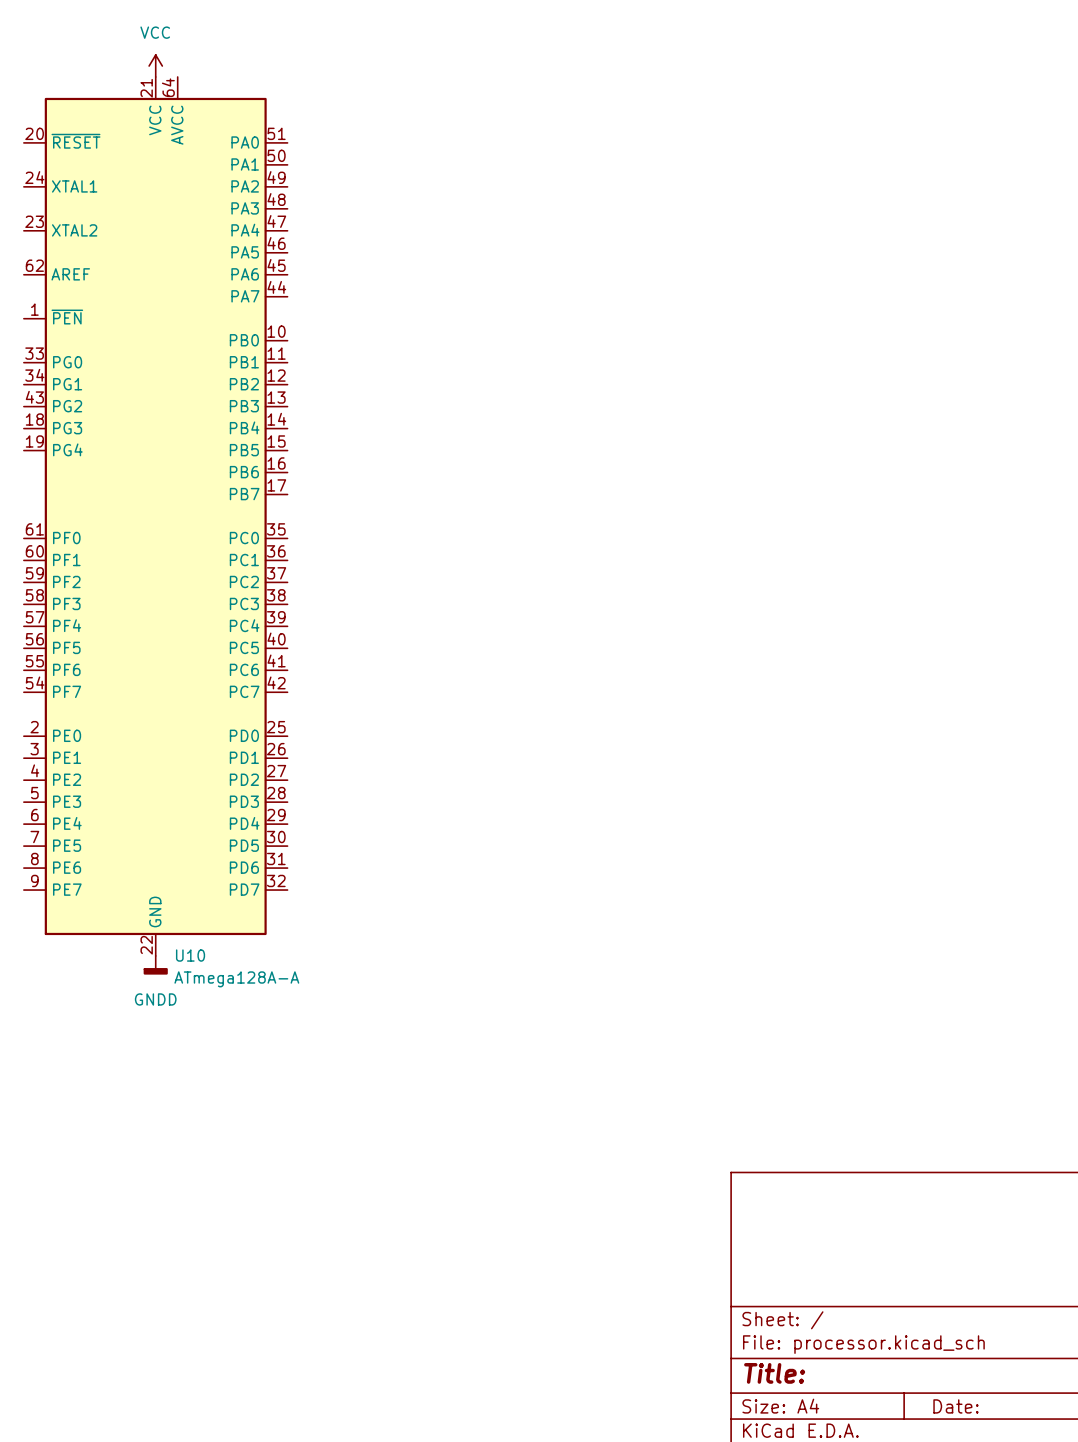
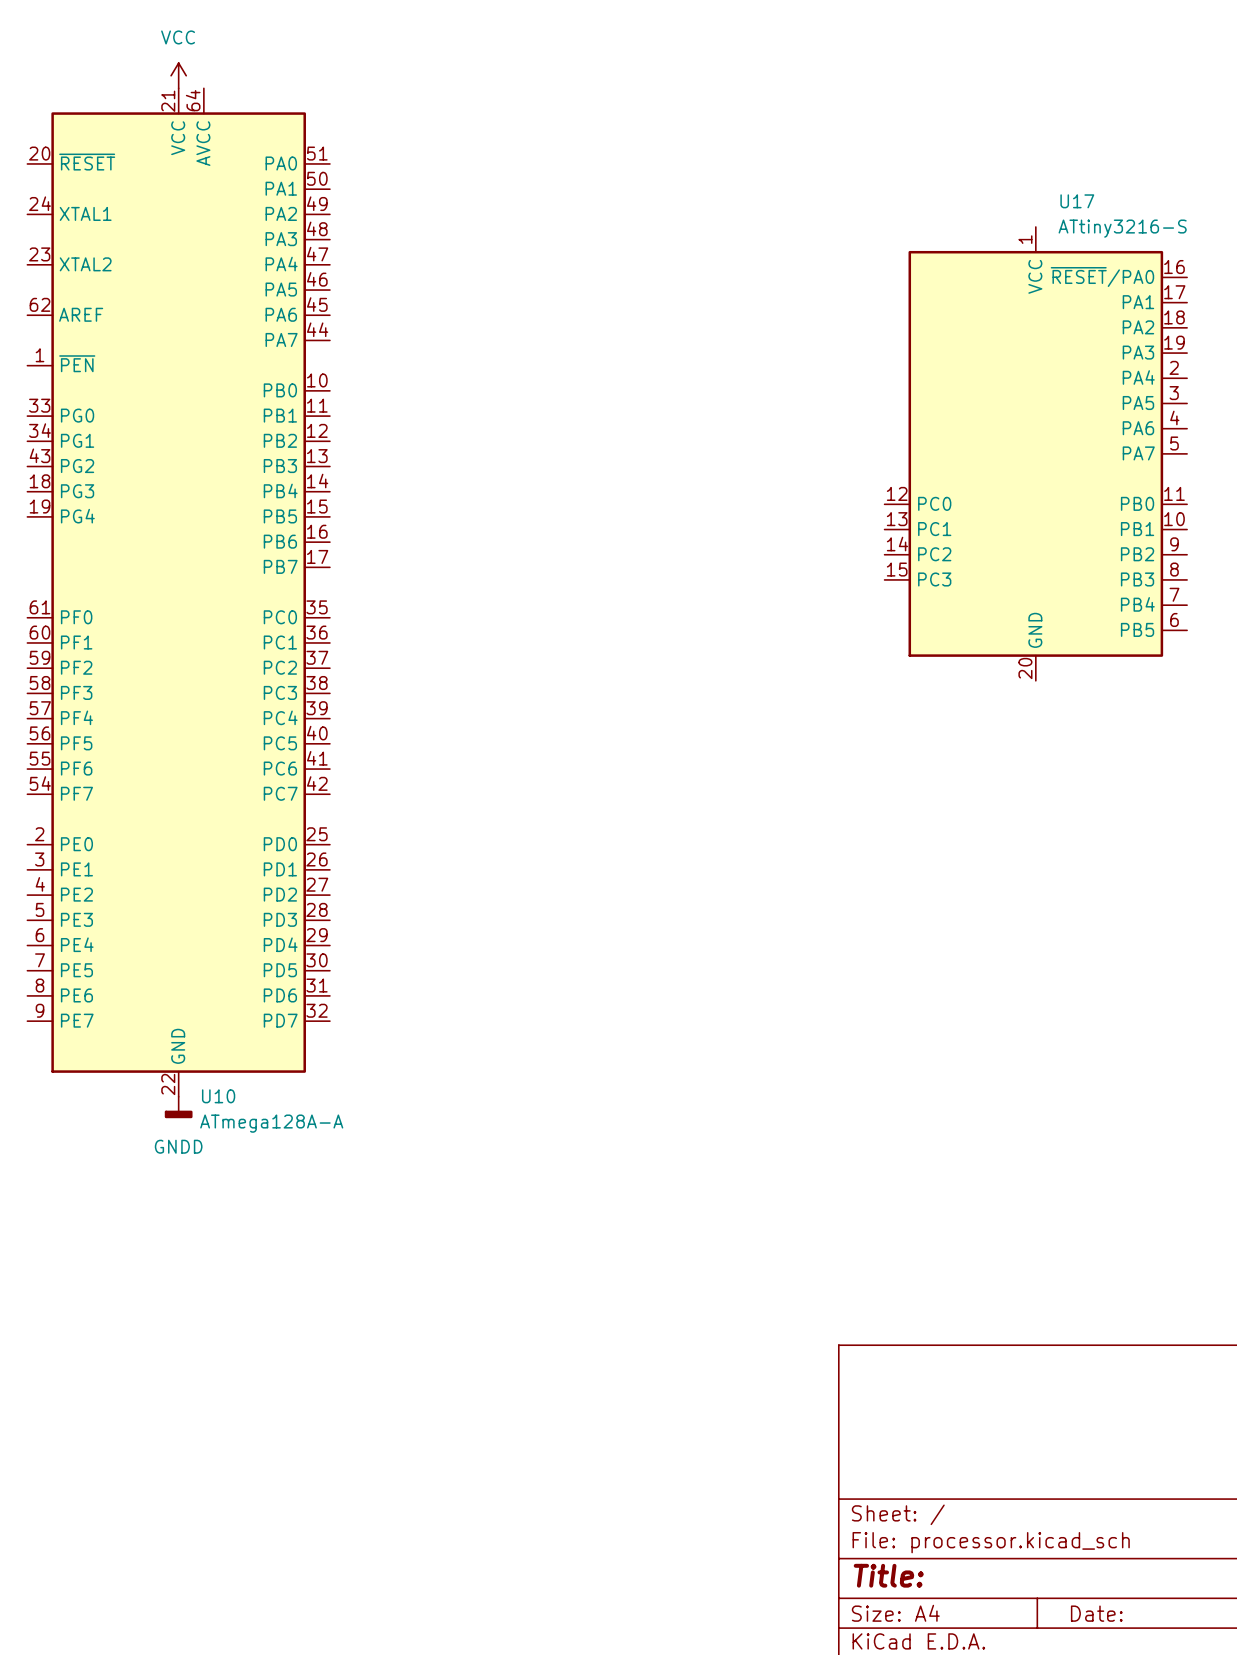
U17: none -> ATtiny3216-S (1035, 453)

